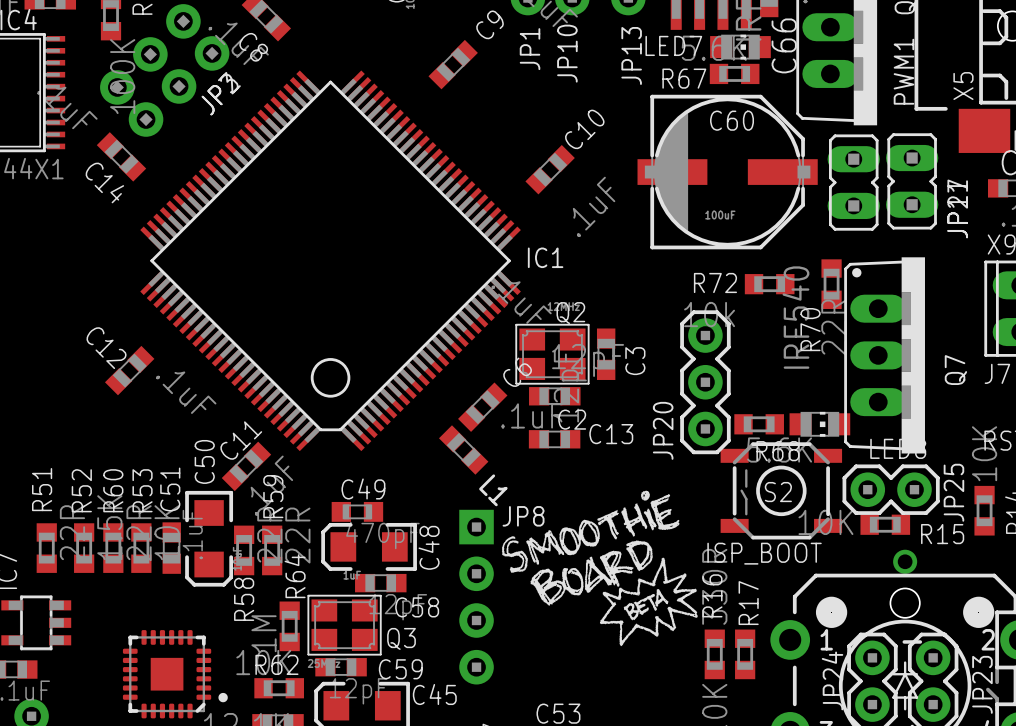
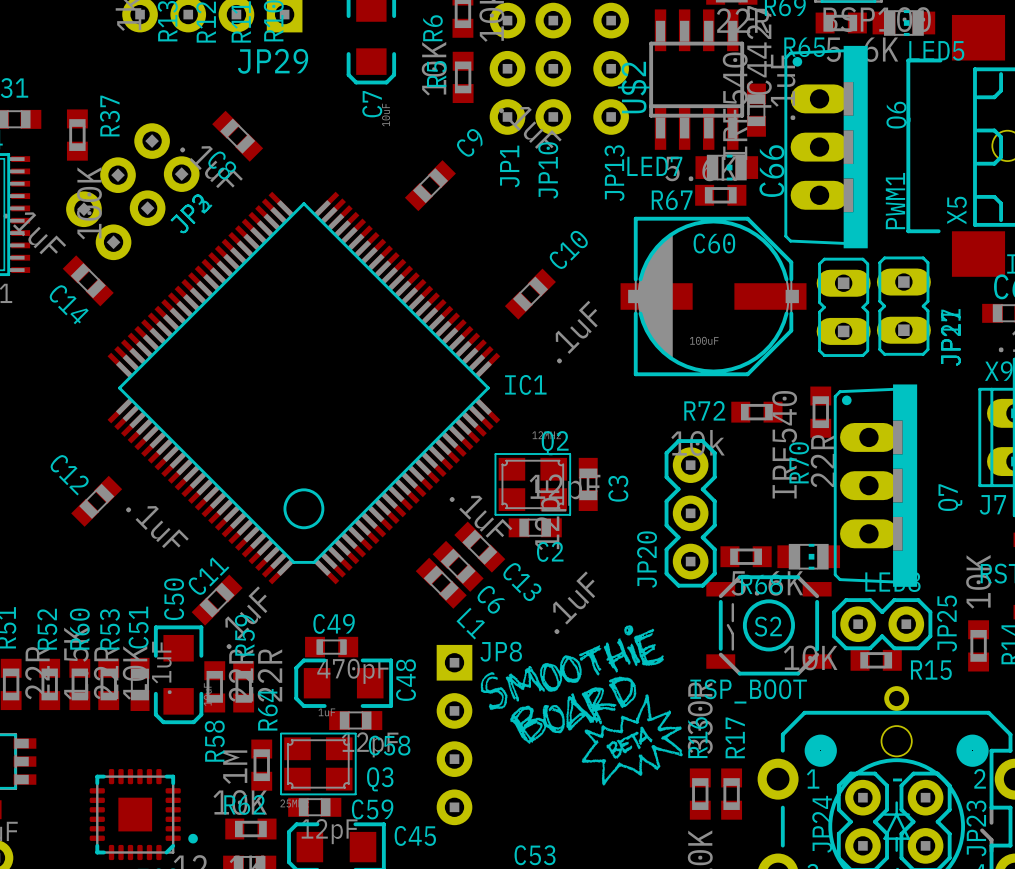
C6 rotation: 0° (482, 407) -> 90° clockwise (458, 566)
C13 rotation: 0° (554, 439) -> 45° clockwise (479, 547)
C13 position: (554, 439) -> (479, 547)

